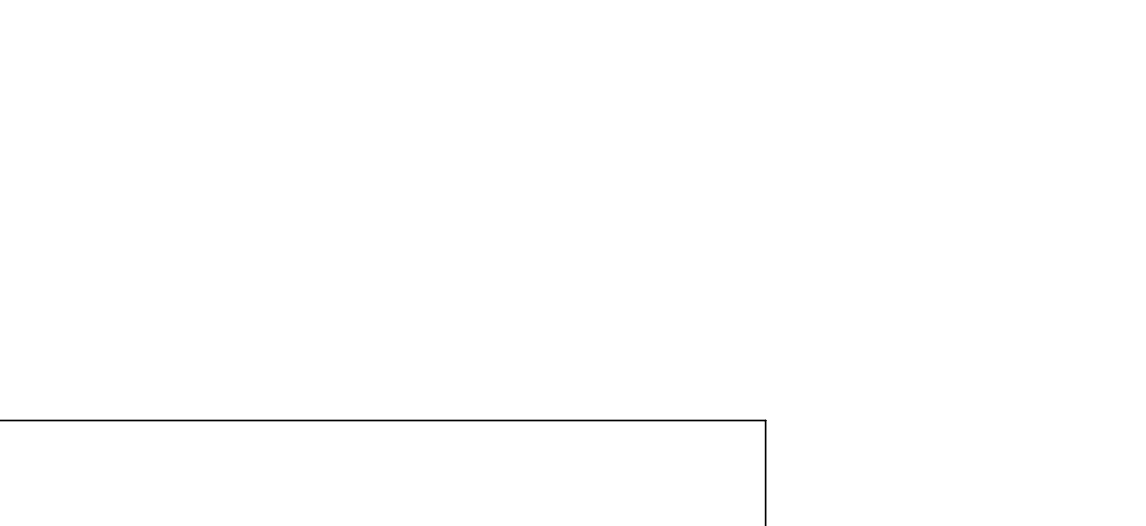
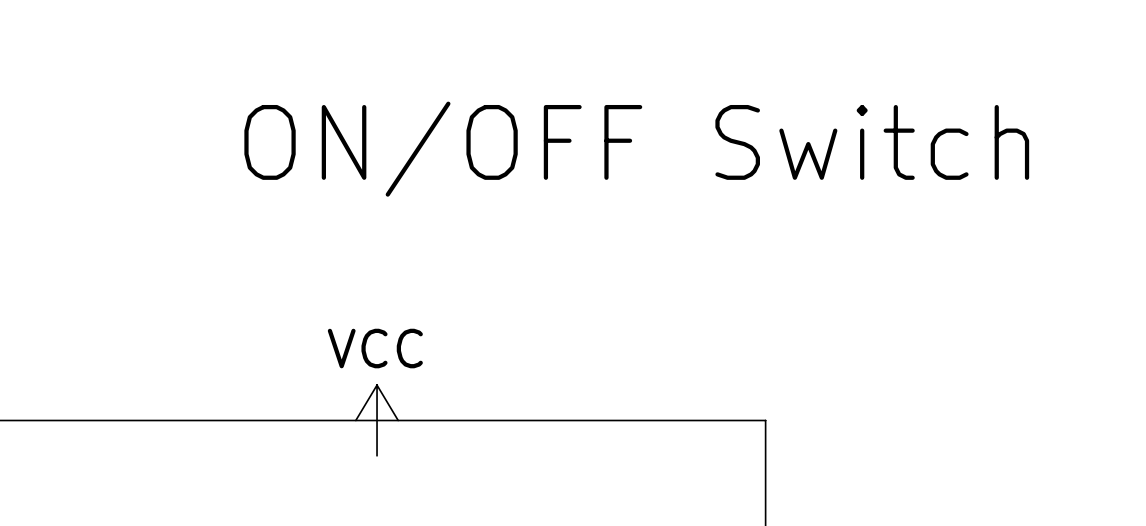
text: none -> ON/OFF Switch (636, 149)
power symbol: none -> VCC (377, 420)

